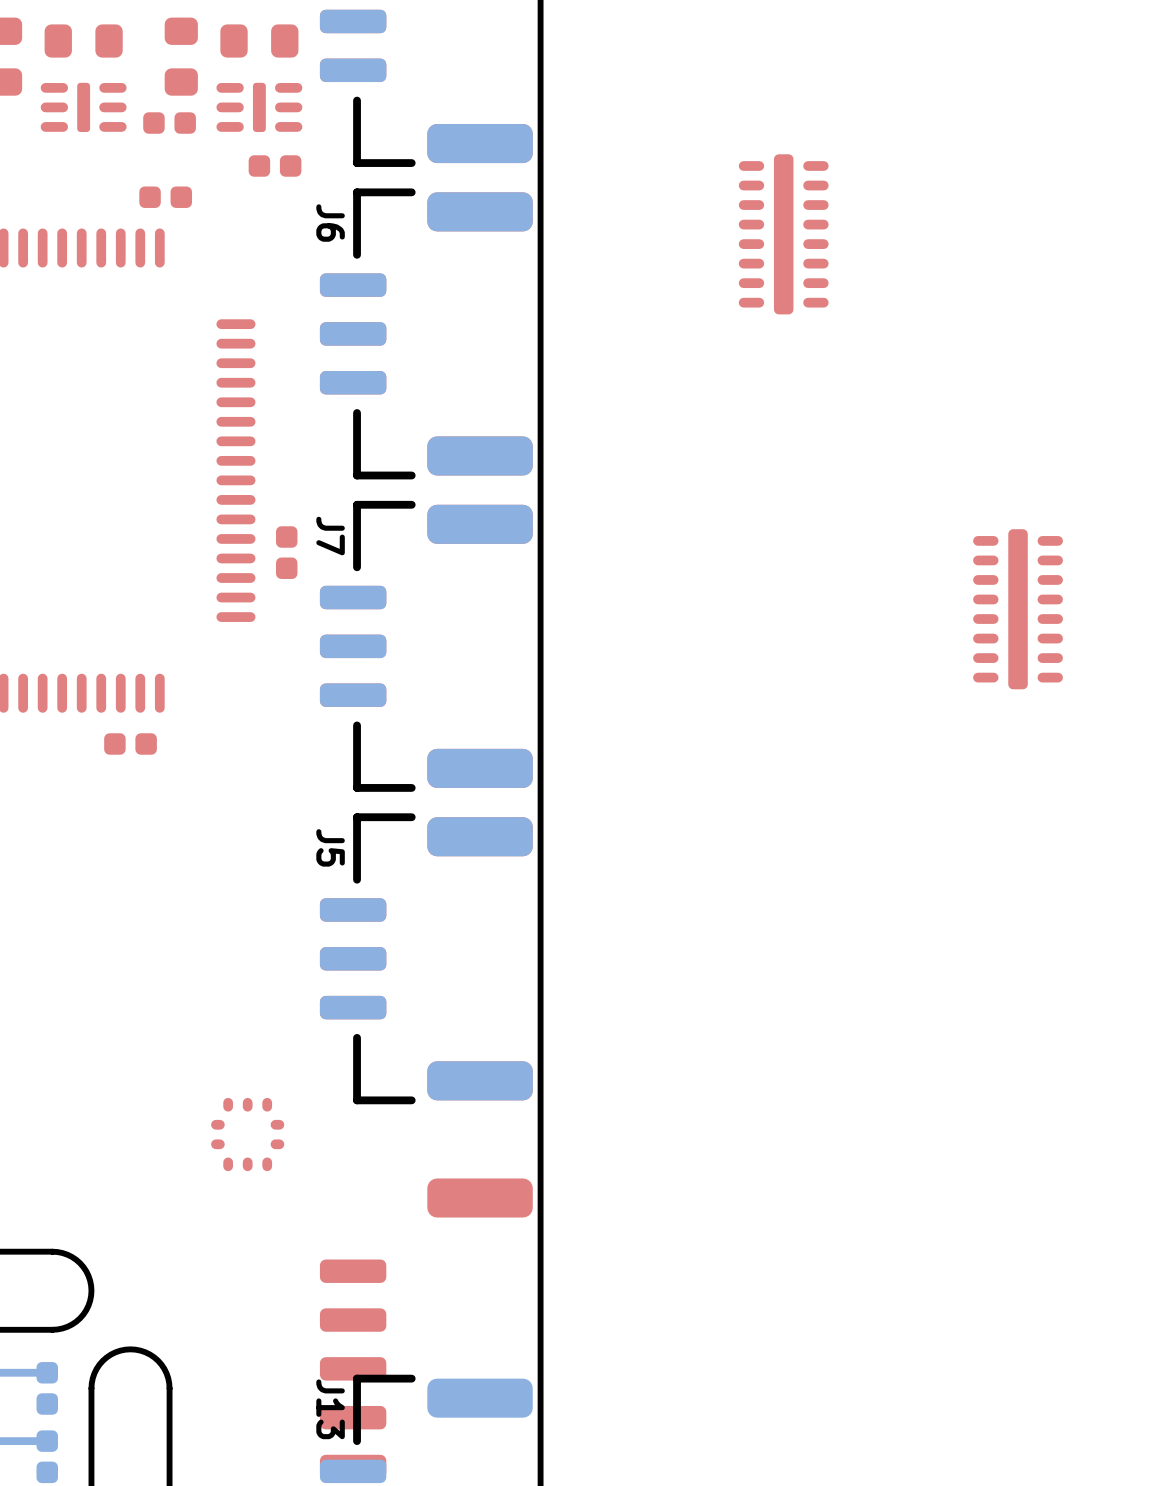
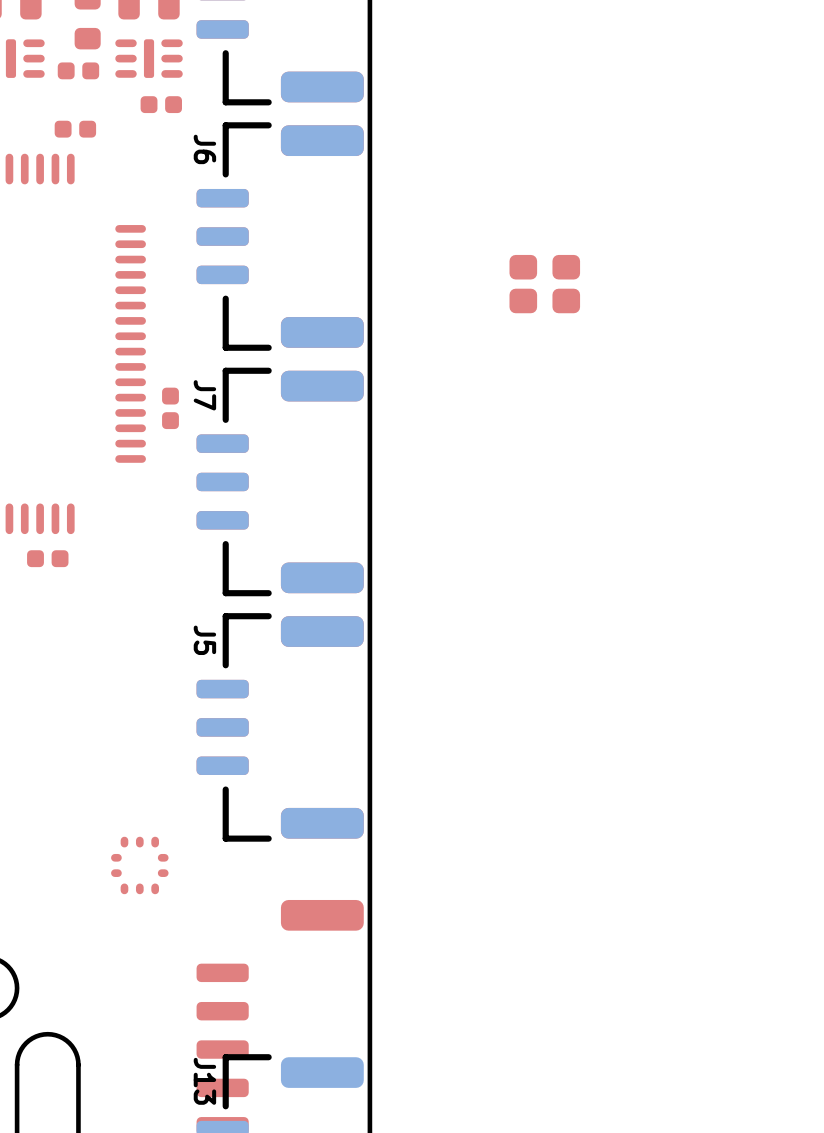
part: (783, 234) -> none
part: none -> (544, 284)
part: (1018, 609) -> none

